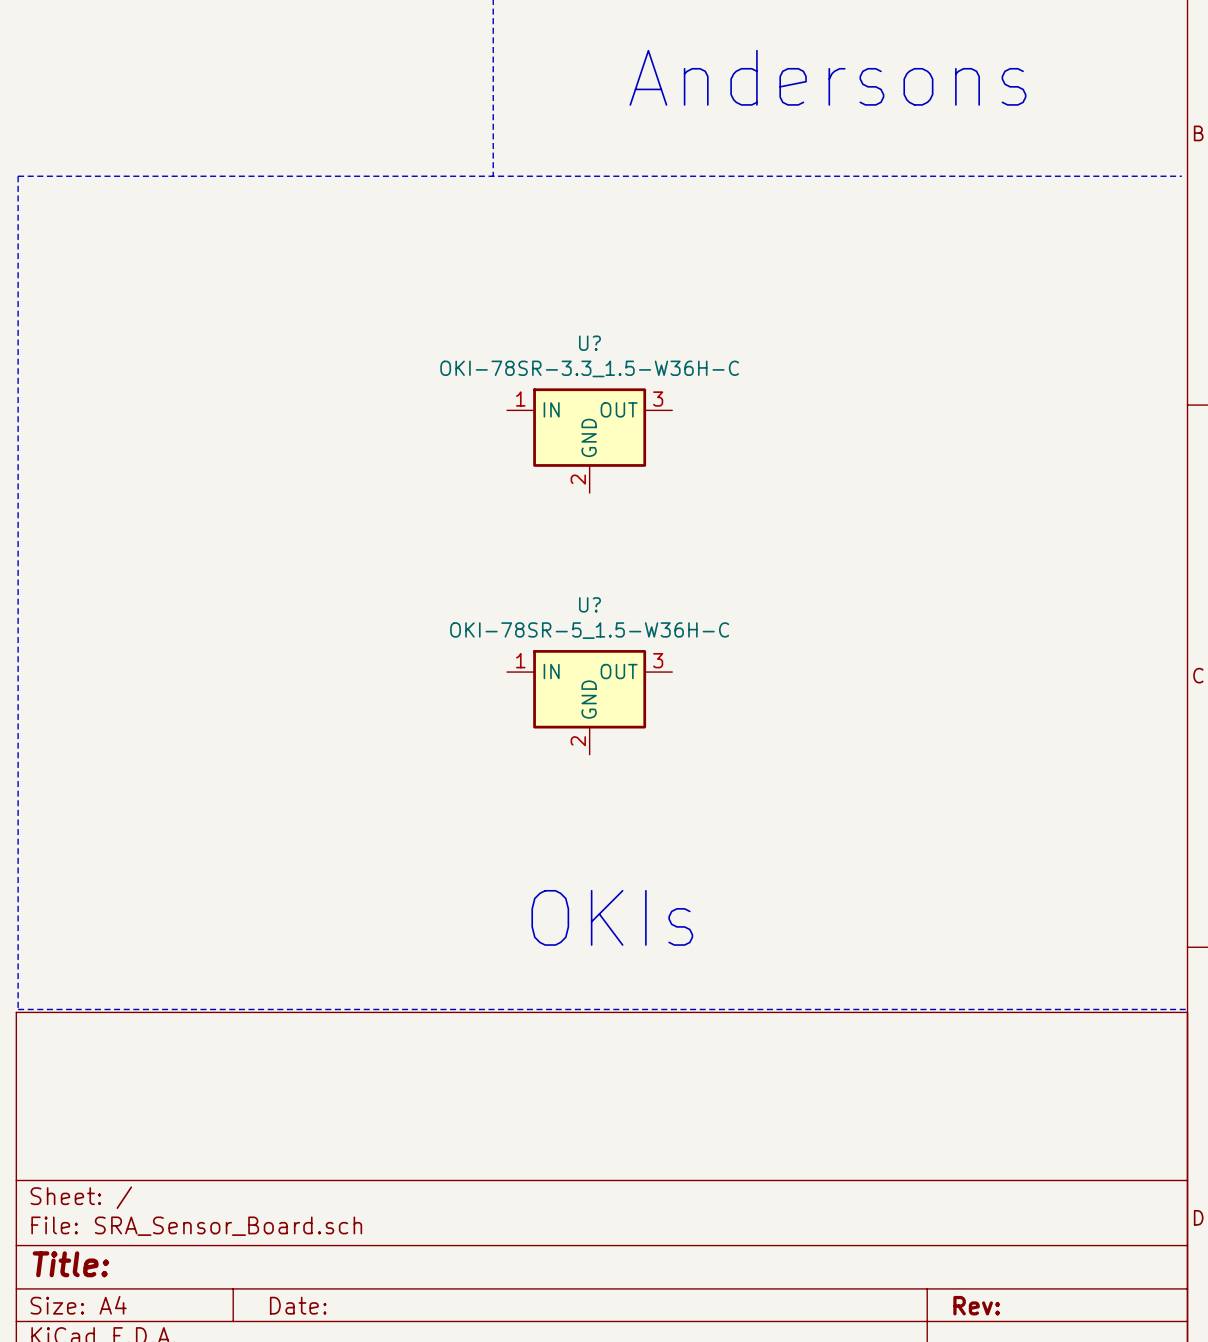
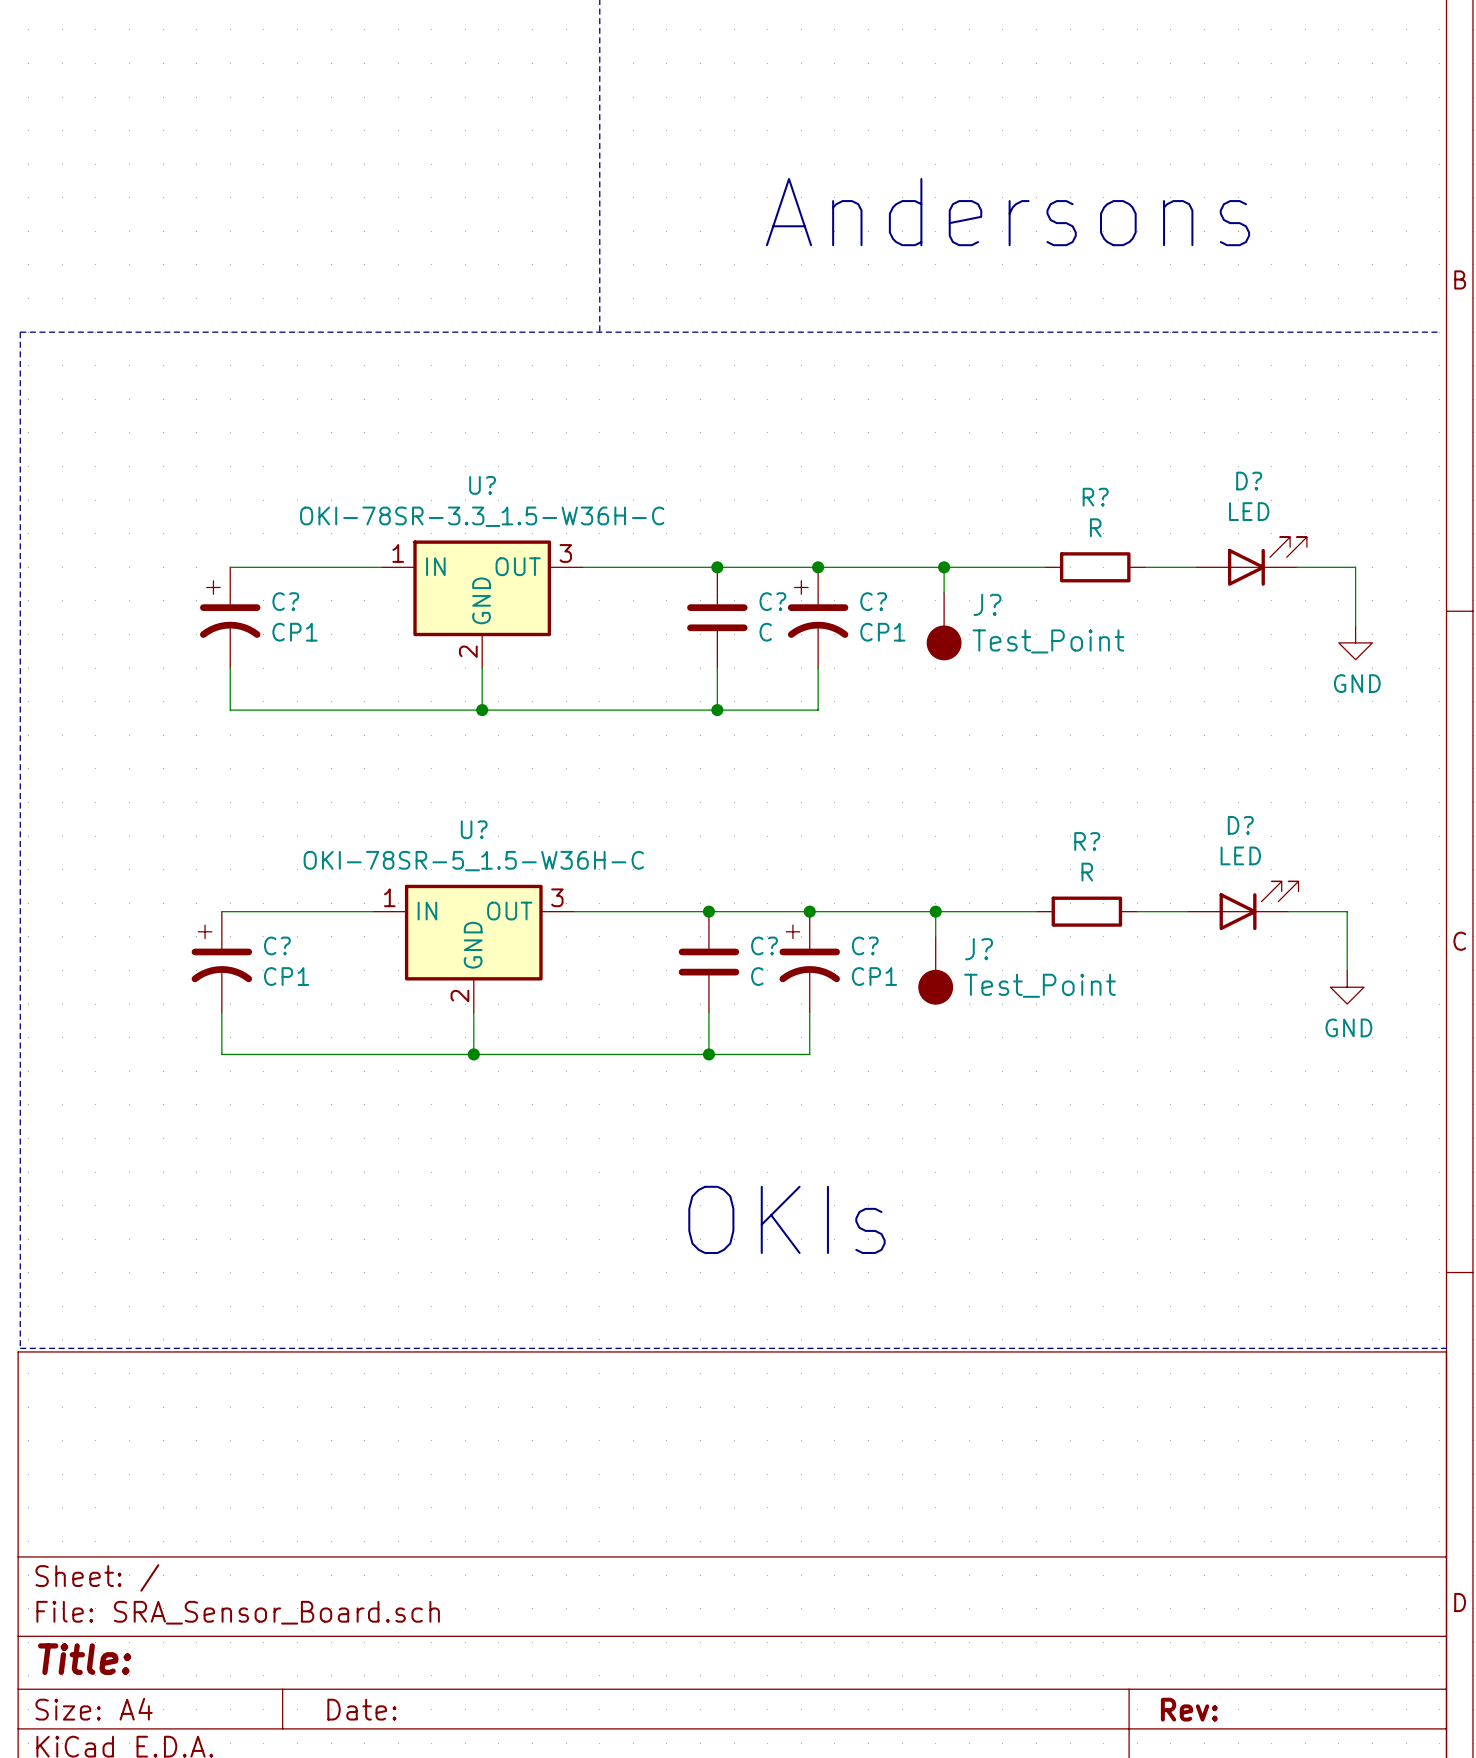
D?: none -> LED (1251, 561)
wire: none -> (230, 567) (381, 567)
wire: none -> (582, 567) (1044, 567)
junction: none -> (717, 567)
junction: none -> (818, 567)
wire: none -> (944, 567) (944, 592)
junction: none -> (944, 567)
R?: none -> R (1095, 567)
wire: none -> (1145, 567) (1196, 567)
wire: none -> (1296, 567) (1355, 567) (1355, 626)
C?: none -> CP1 (230, 617)
C?: none -> C (717, 617)
C?: none -> CP1 (818, 617)
J?: none -> Test_Point (944, 626)
power symbol: none -> GND (1355, 642)
U? position: (589, 440) -> (482, 604)
wire: none -> (230, 668) (230, 710) (818, 710) (818, 668)
wire: none -> (482, 668) (482, 710)
junction: none -> (482, 710)
junction: none -> (717, 710)
D?: none -> LED (1243, 905)
wire: none -> (221, 911) (373, 911)
wire: none -> (574, 911) (1036, 911)
junction: none -> (708, 911)
junction: none -> (809, 911)
wire: none -> (935, 911) (935, 936)
junction: none -> (935, 911)
R?: none -> R (1086, 911)
wire: none -> (1137, 911) (1187, 911)
wire: none -> (1288, 911) (1347, 911) (1347, 970)
C?: none -> CP1 (221, 962)
C?: none -> C (708, 962)
C?: none -> CP1 (809, 962)
J?: none -> Test_Point (935, 970)
U? position: (589, 702) -> (473, 948)
power symbol: none -> GND (1347, 987)
wire: none -> (221, 1012) (221, 1054) (809, 1054) (809, 1012)
wire: none -> (473, 1012) (473, 1054)
wire: none -> (708, 1012) (708, 1054)
junction: none -> (473, 1054)
junction: none -> (708, 1054)
text position: OKIs (612, 917) -> OKIs (786, 1219)

